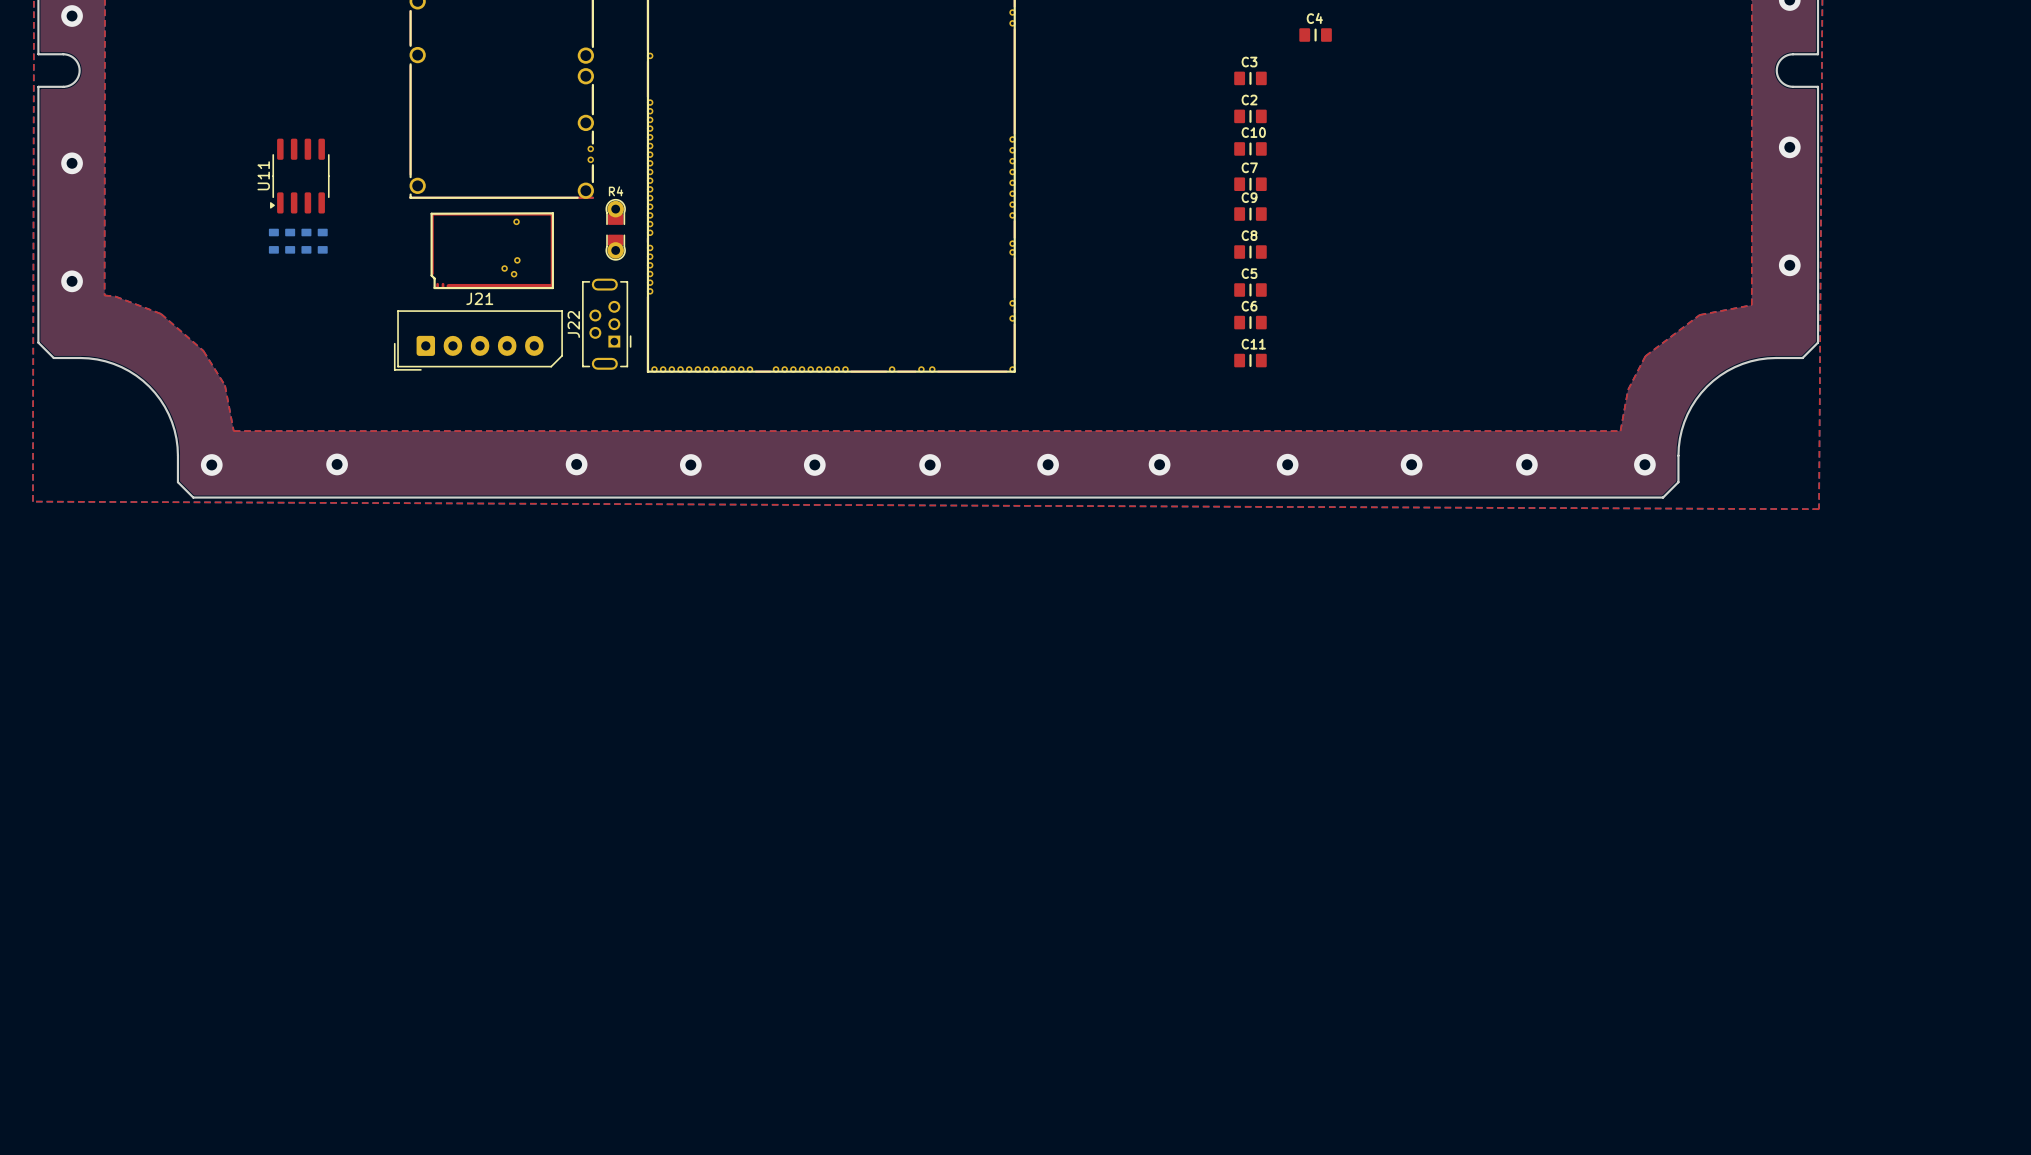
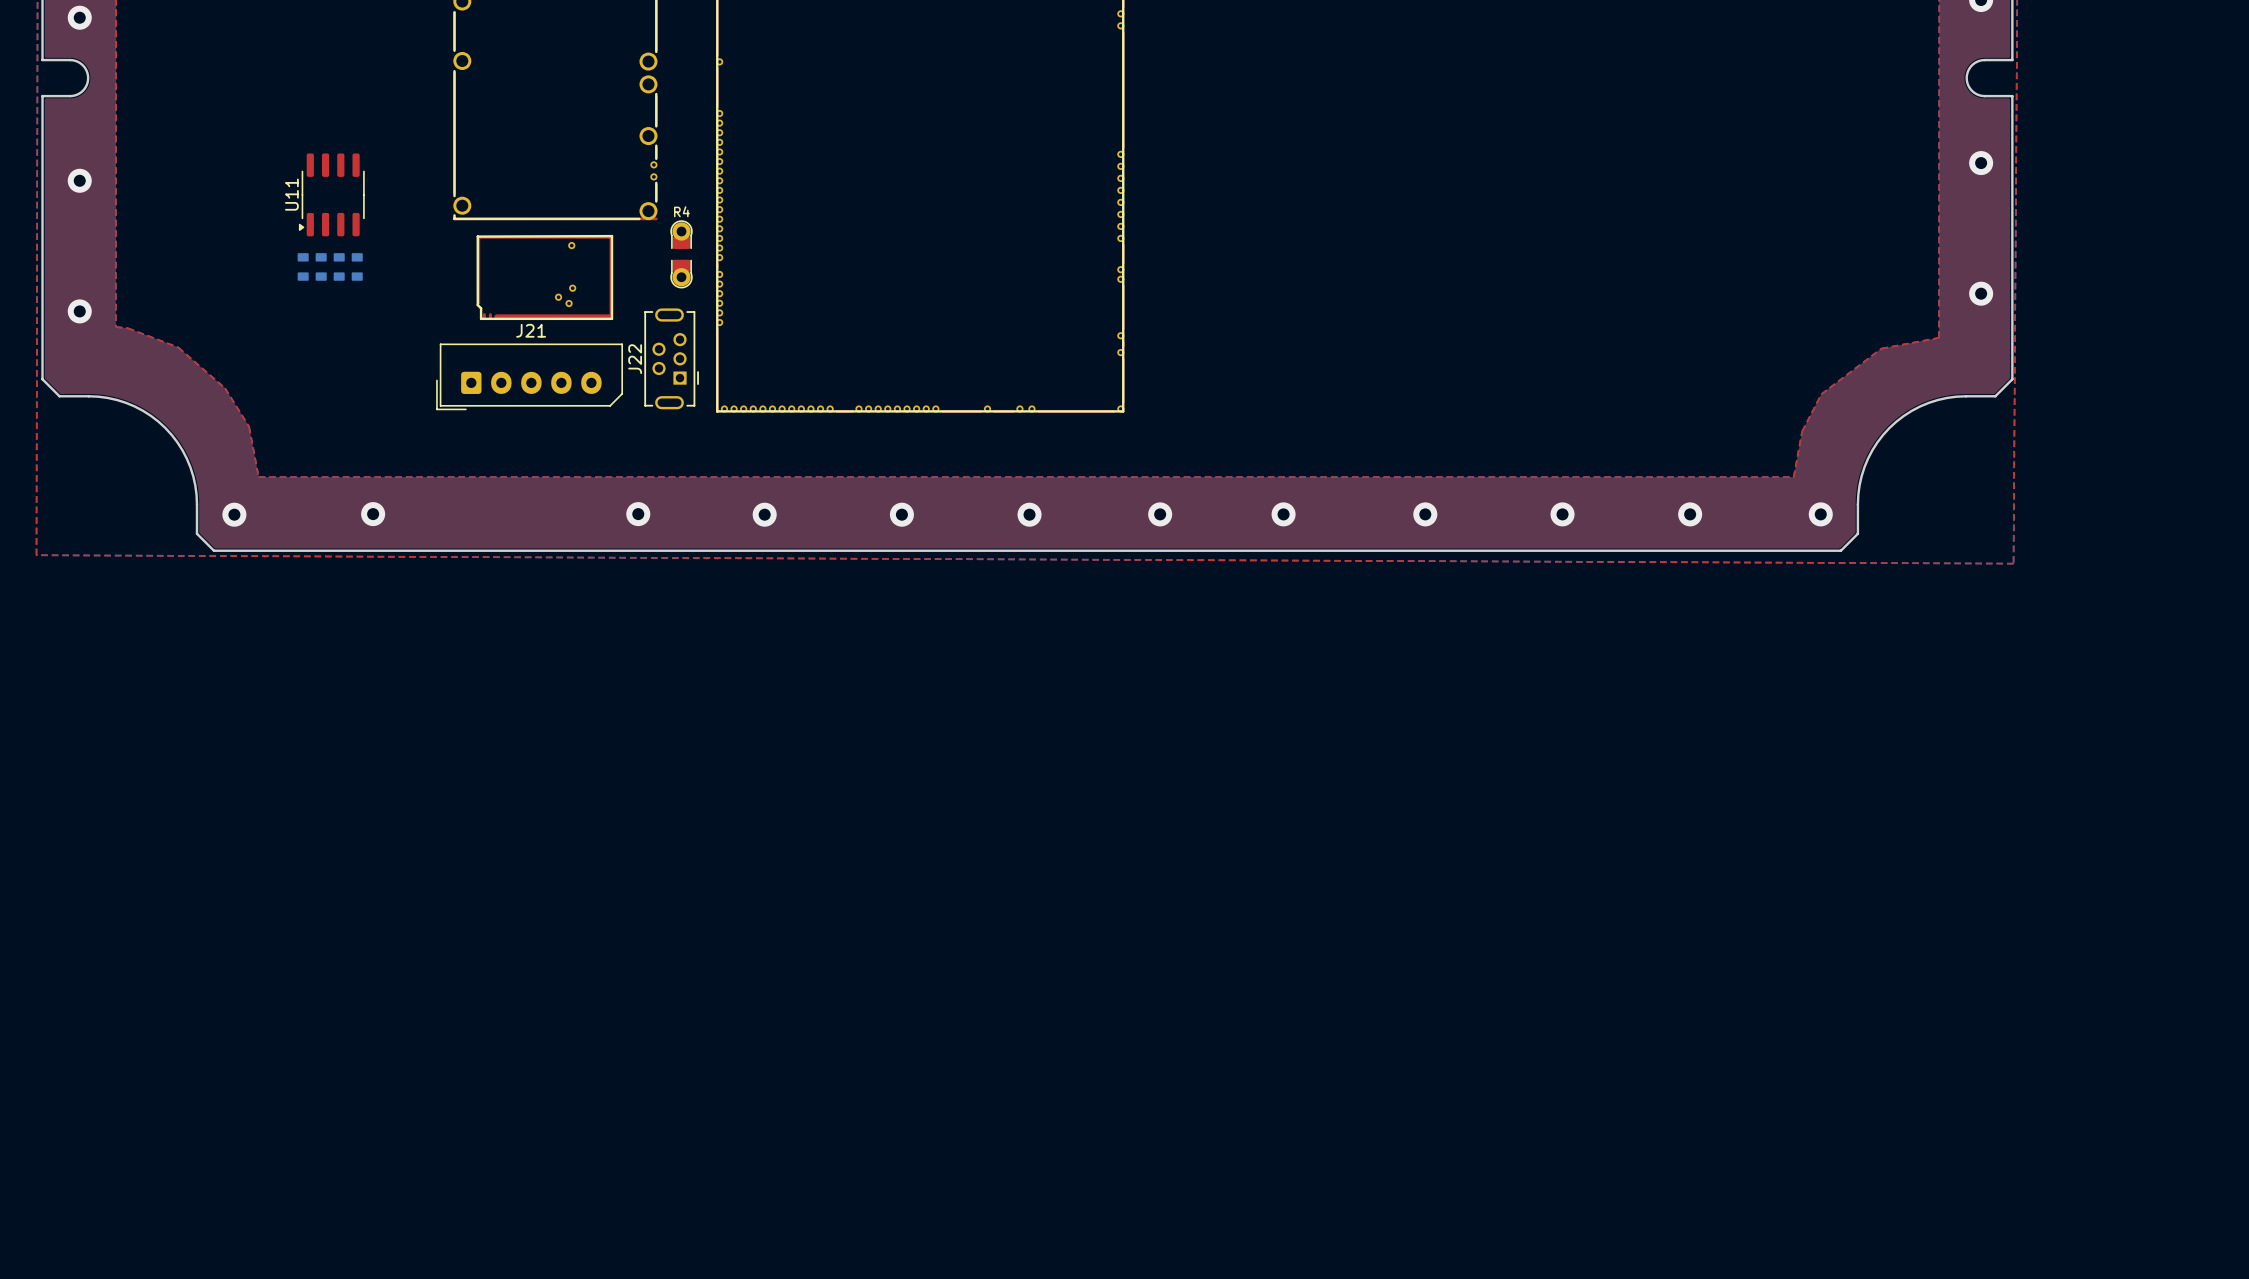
C4: (1315, 35) -> none
C3: (1250, 78) -> none
C2: (1250, 116) -> none
C10: (1250, 148) -> none
C7: (1250, 184) -> none
C9: (1250, 214) -> none
C8: (1250, 252) -> none
C5: (1250, 290) -> none
C6: (1250, 322) -> none
C11: (1250, 360) -> none

